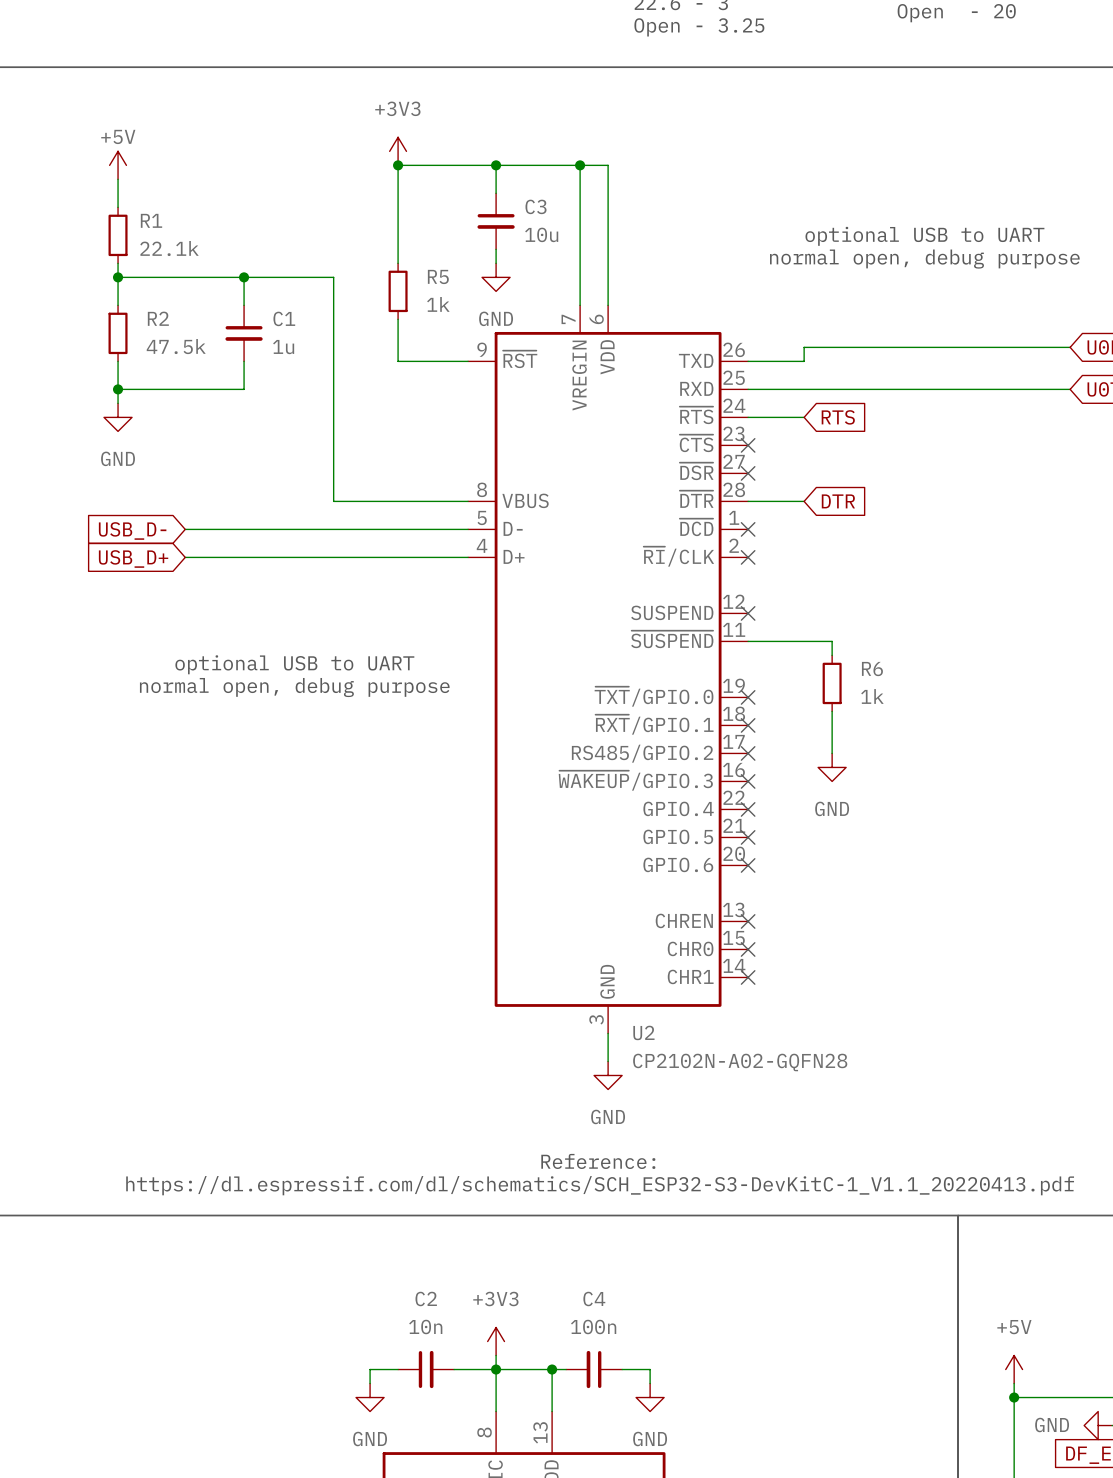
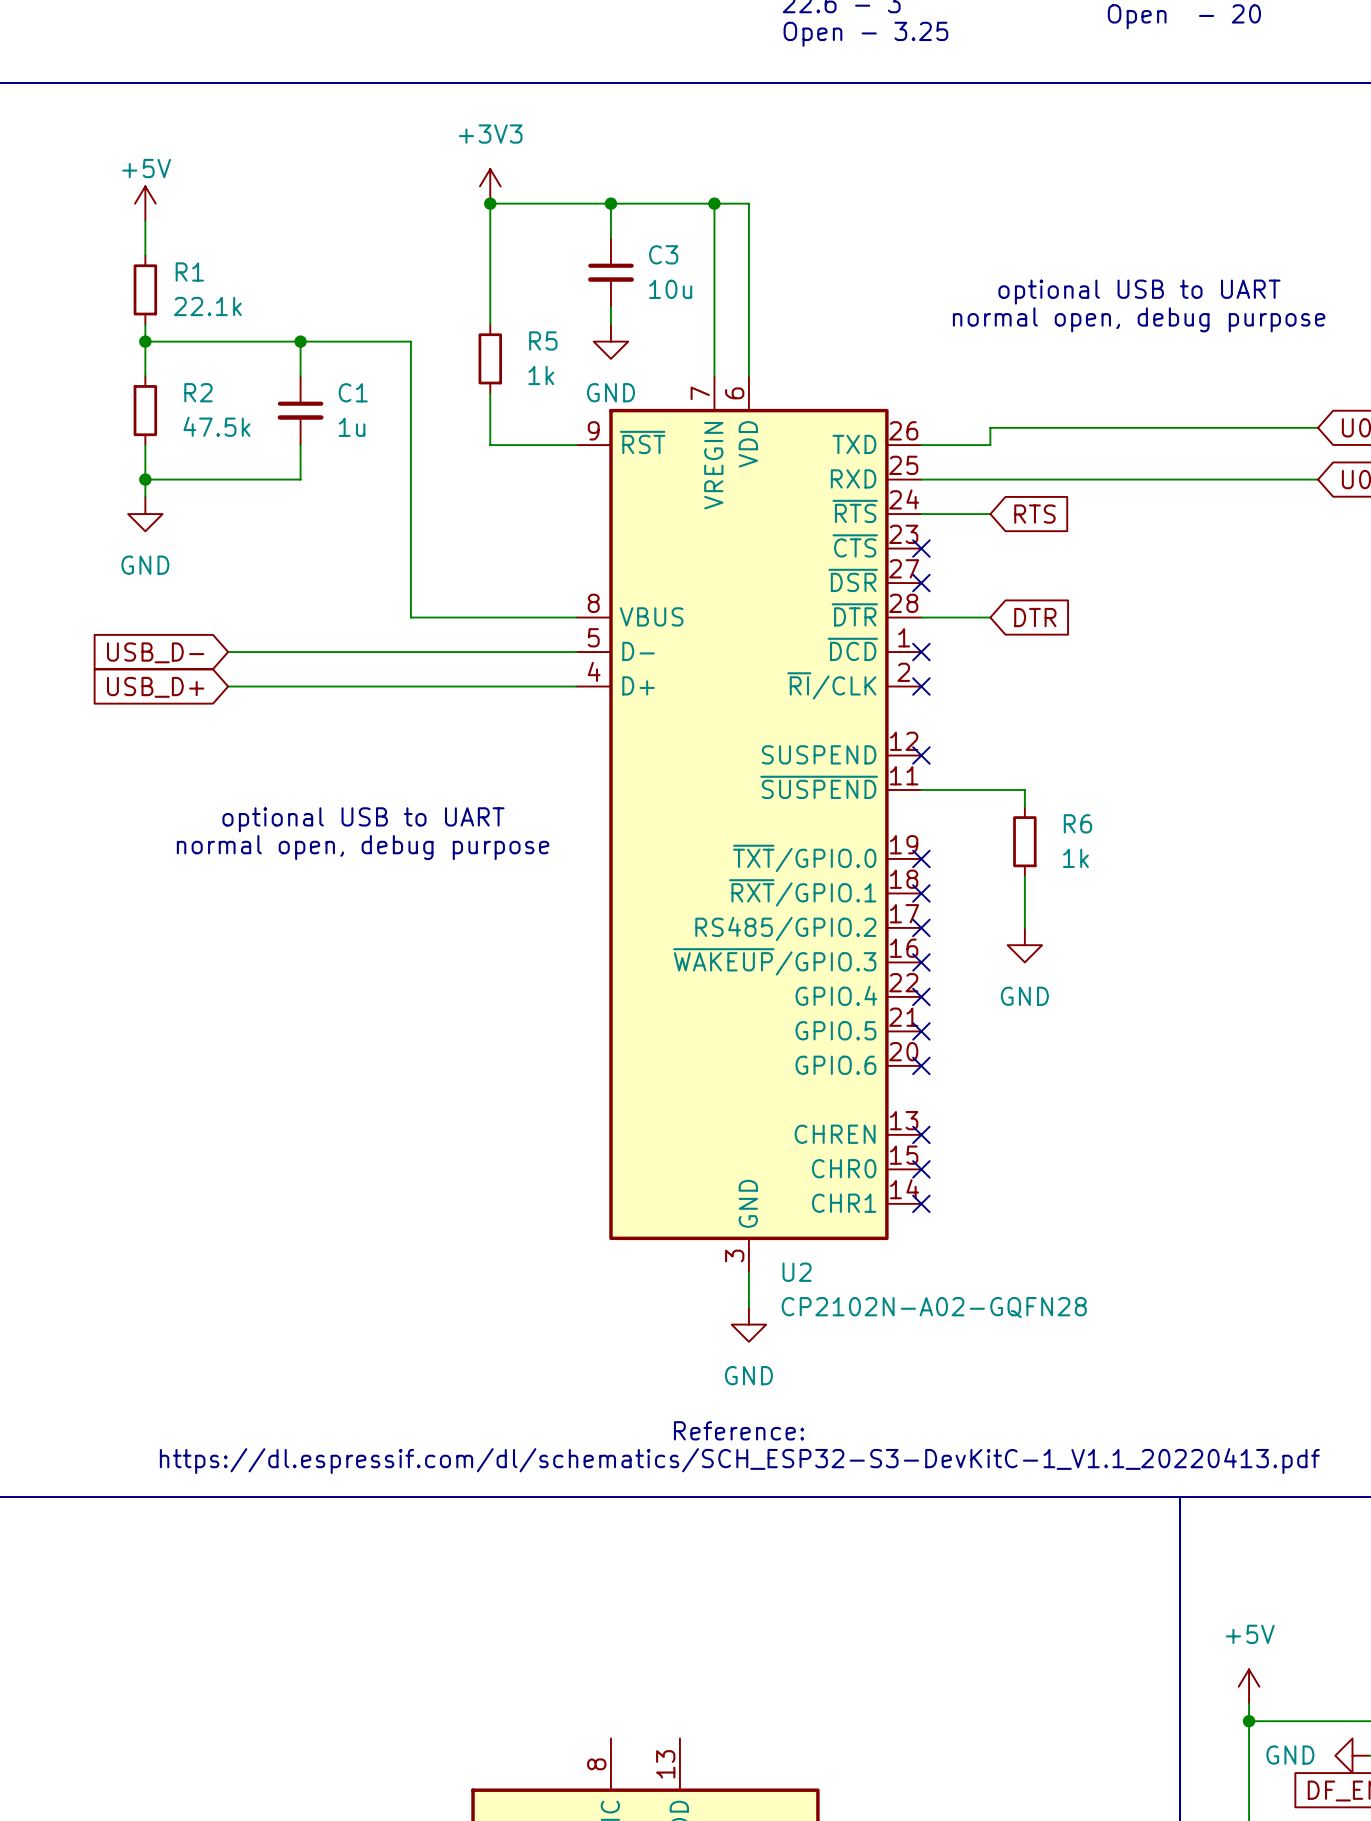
power symbol: +3V3 (496, 1341) -> none
wire: (496, 1355) (496, 1411) -> none
wire: (398, 1369) (370, 1369) (370, 1383) -> none
C2: 10n (426, 1369) -> none
wire: (454, 1369) (566, 1369) -> none
junction: (496, 1369) -> none
wire: (552, 1369) (552, 1411) -> none
junction: (552, 1369) -> none
C4: 100n (594, 1369) -> none
wire: (622, 1369) (650, 1369) (650, 1383) -> none
power symbol: GND (370, 1397) -> none
power symbol: GND (650, 1397) -> none

